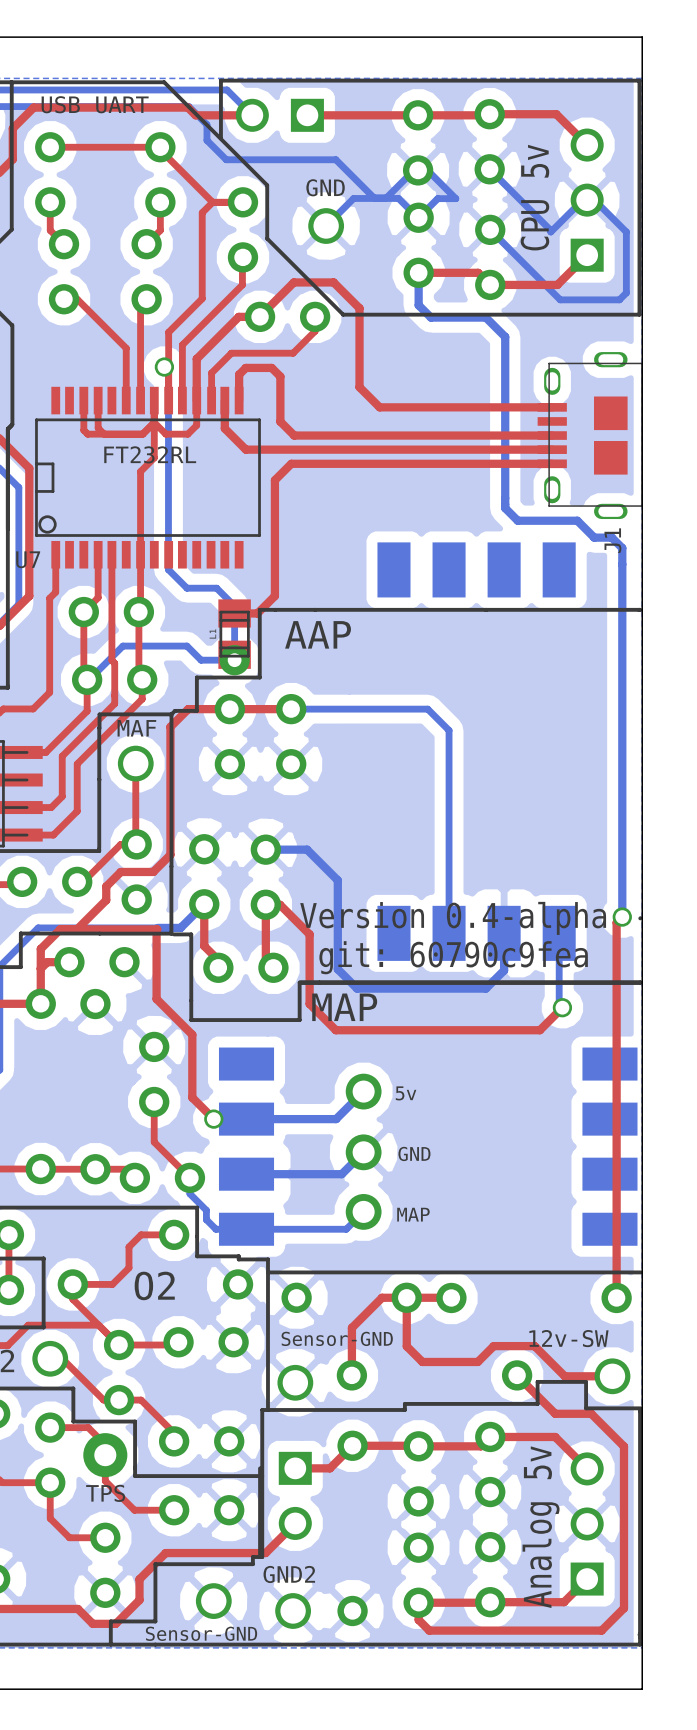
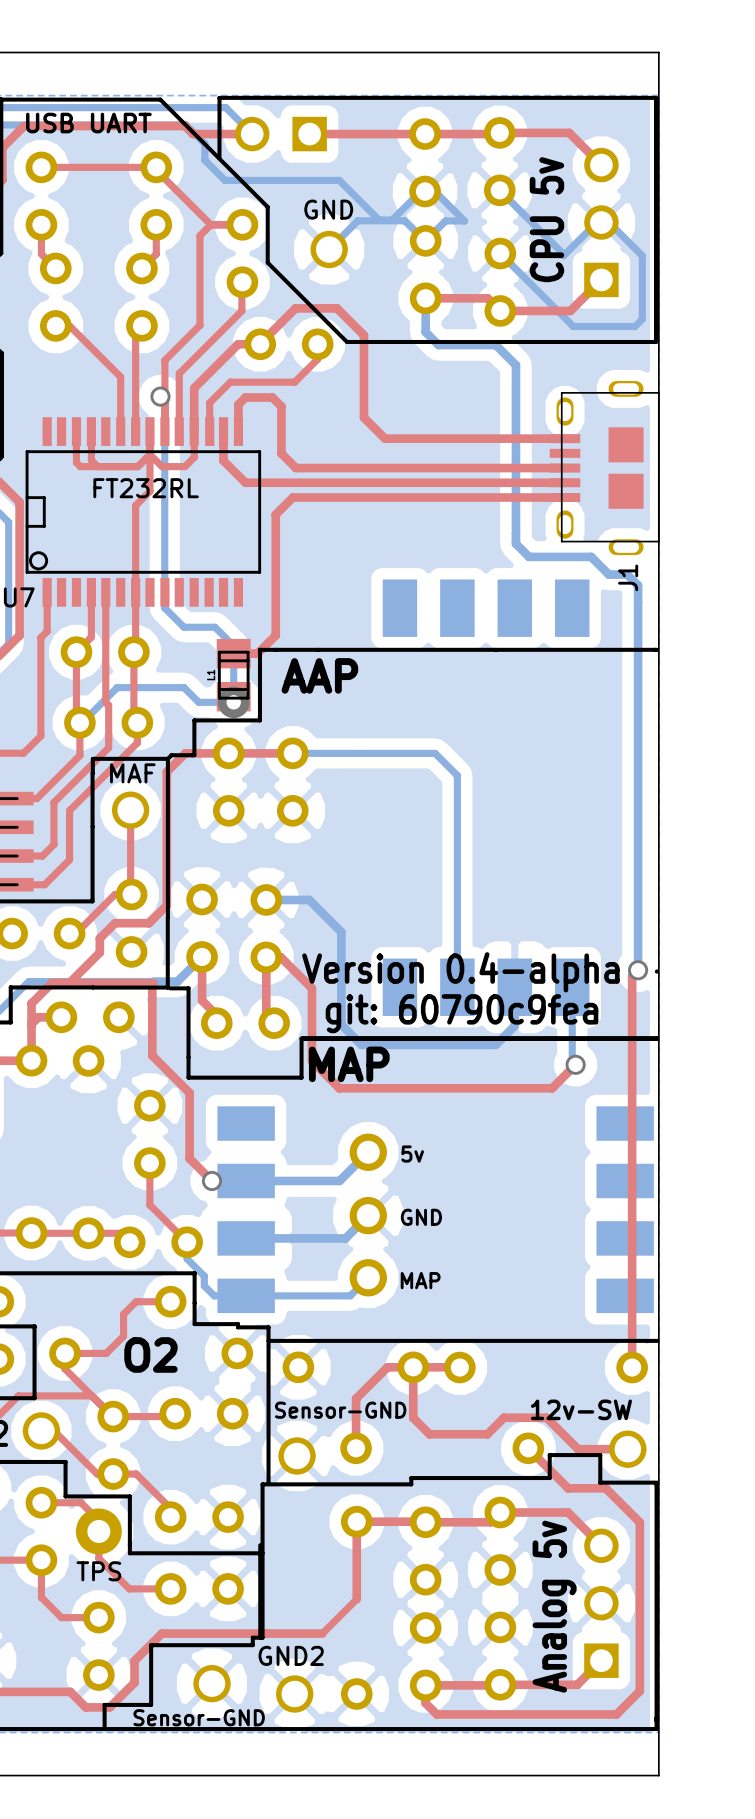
top track: (352, 1445) (329, 1468) (295, 1468) -> none
part: (295, 1495) -> none
top track: none -> (356, 1599) (356, 1521) (356, 1599)
top track: (295, 1523) (265, 1553) -> (356, 1599) (322, 1633) (266, 1633)

